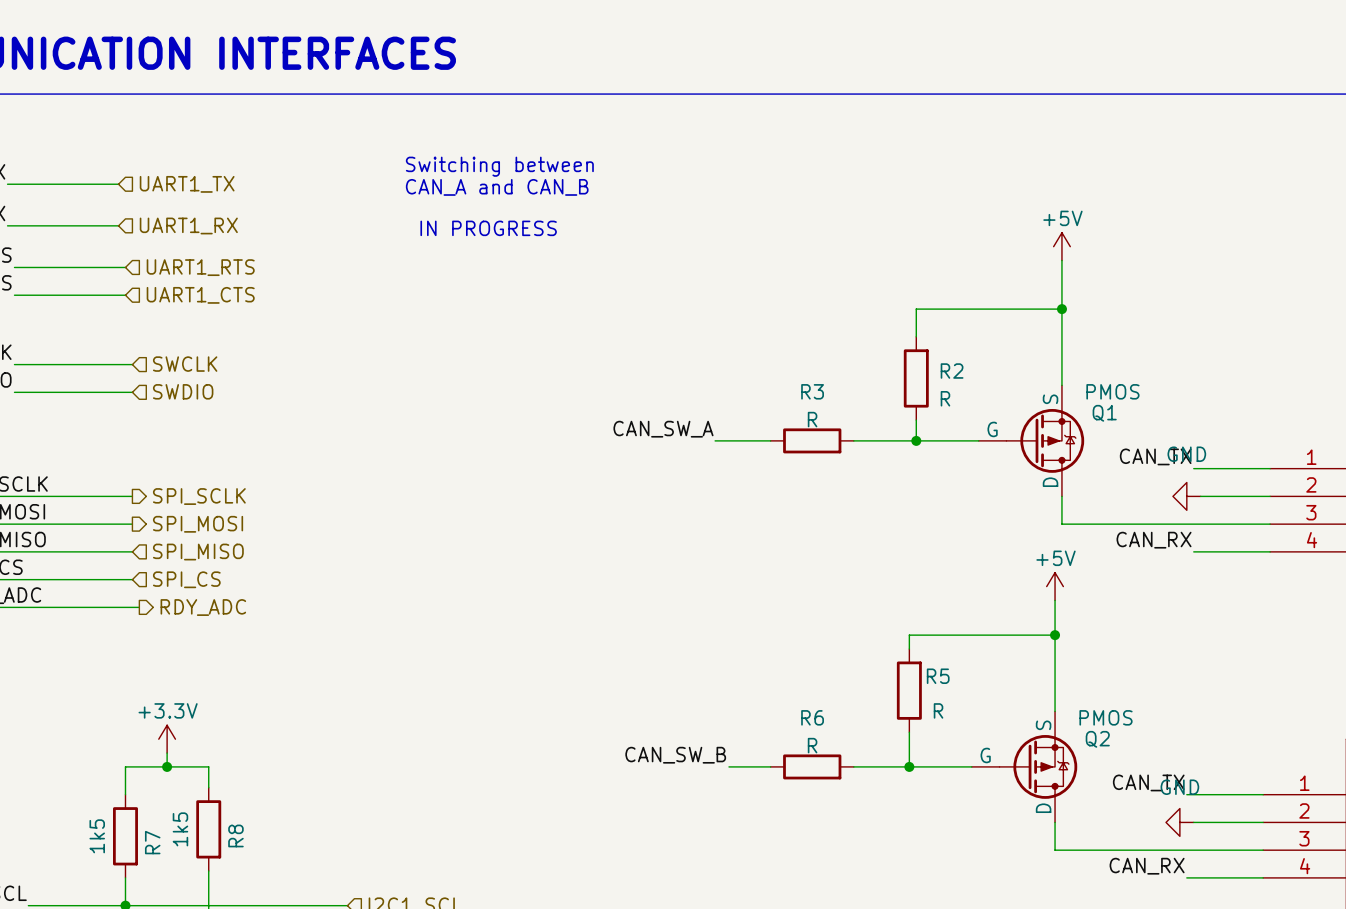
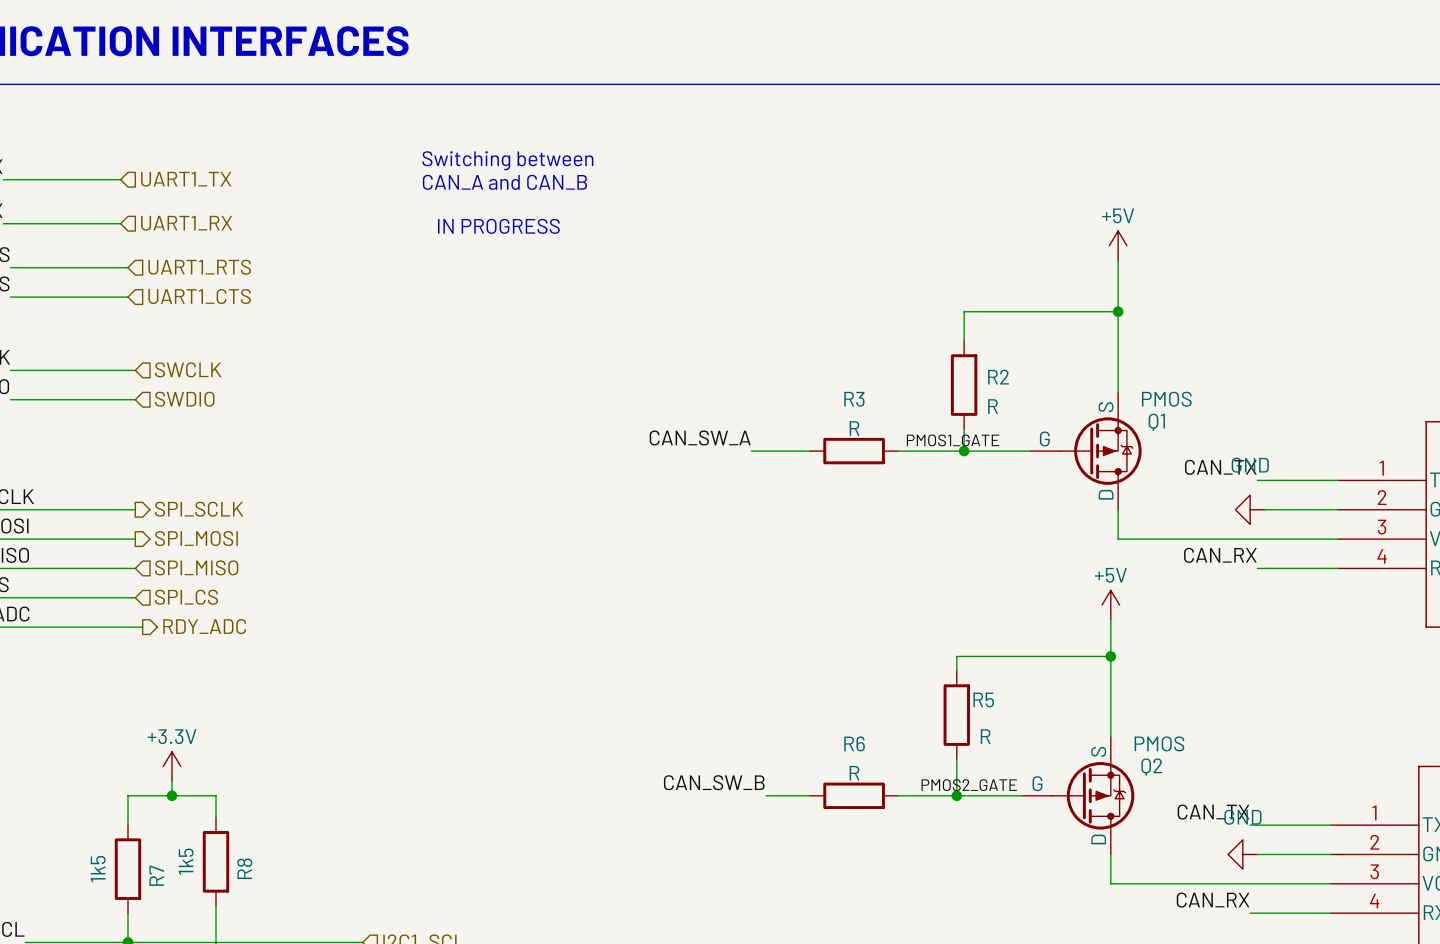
label: none -> PMOS1_GATE (953, 440)
label: none -> PMOS2_GATE (969, 785)

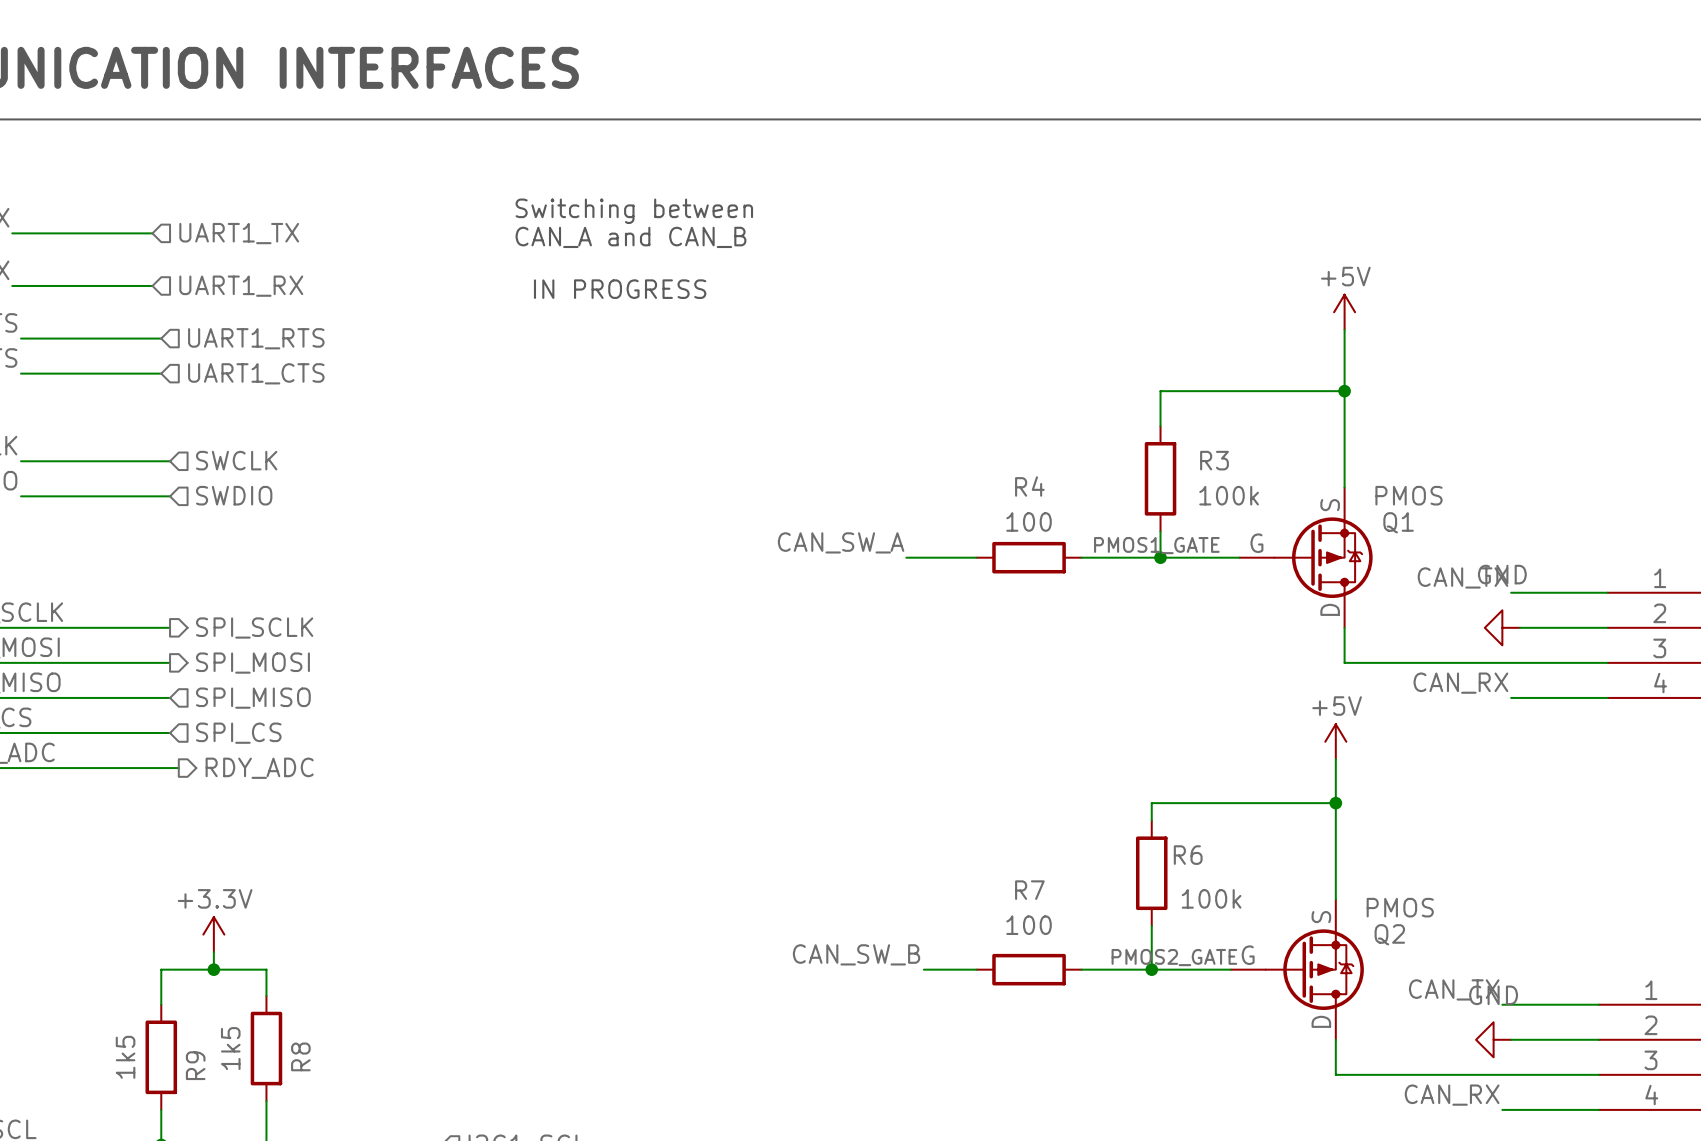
R2 name: R2 (998, 377) -> R3 (1214, 460)
R3 name: R3 (854, 399) -> R4 (1029, 486)
R2 value: R (993, 406) -> 100k (1229, 495)
R3 value: R (854, 428) -> 100 (1029, 521)
R5 name: R5 (983, 699) -> R6 (1188, 855)
R5 value: R (985, 736) -> 100k (1211, 898)
R6 name: R6 (854, 743) -> R7 (1029, 890)
R6 value: R (854, 773) -> 100 (1029, 925)
R7 name: R7 (156, 875) -> R9 (195, 1065)

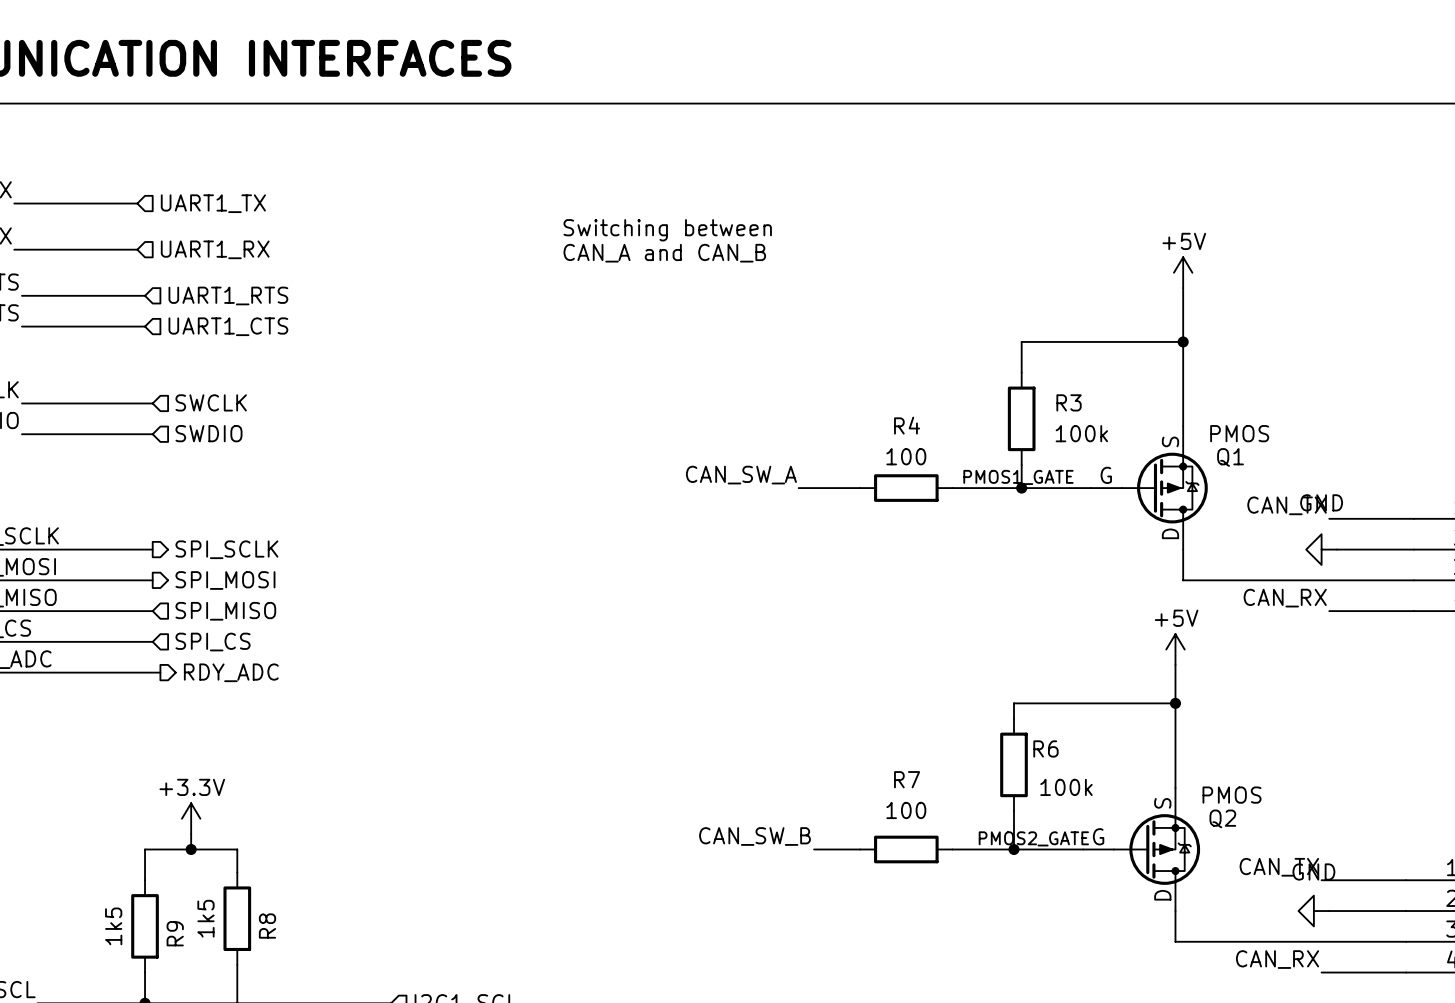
text position: Switching between (634, 211) -> Switching between (667, 230)
text position: CAN_A and CAN_B (630, 237) -> CAN_A and CAN_B (664, 253)
text: IN PROGRESS (620, 289) -> none

